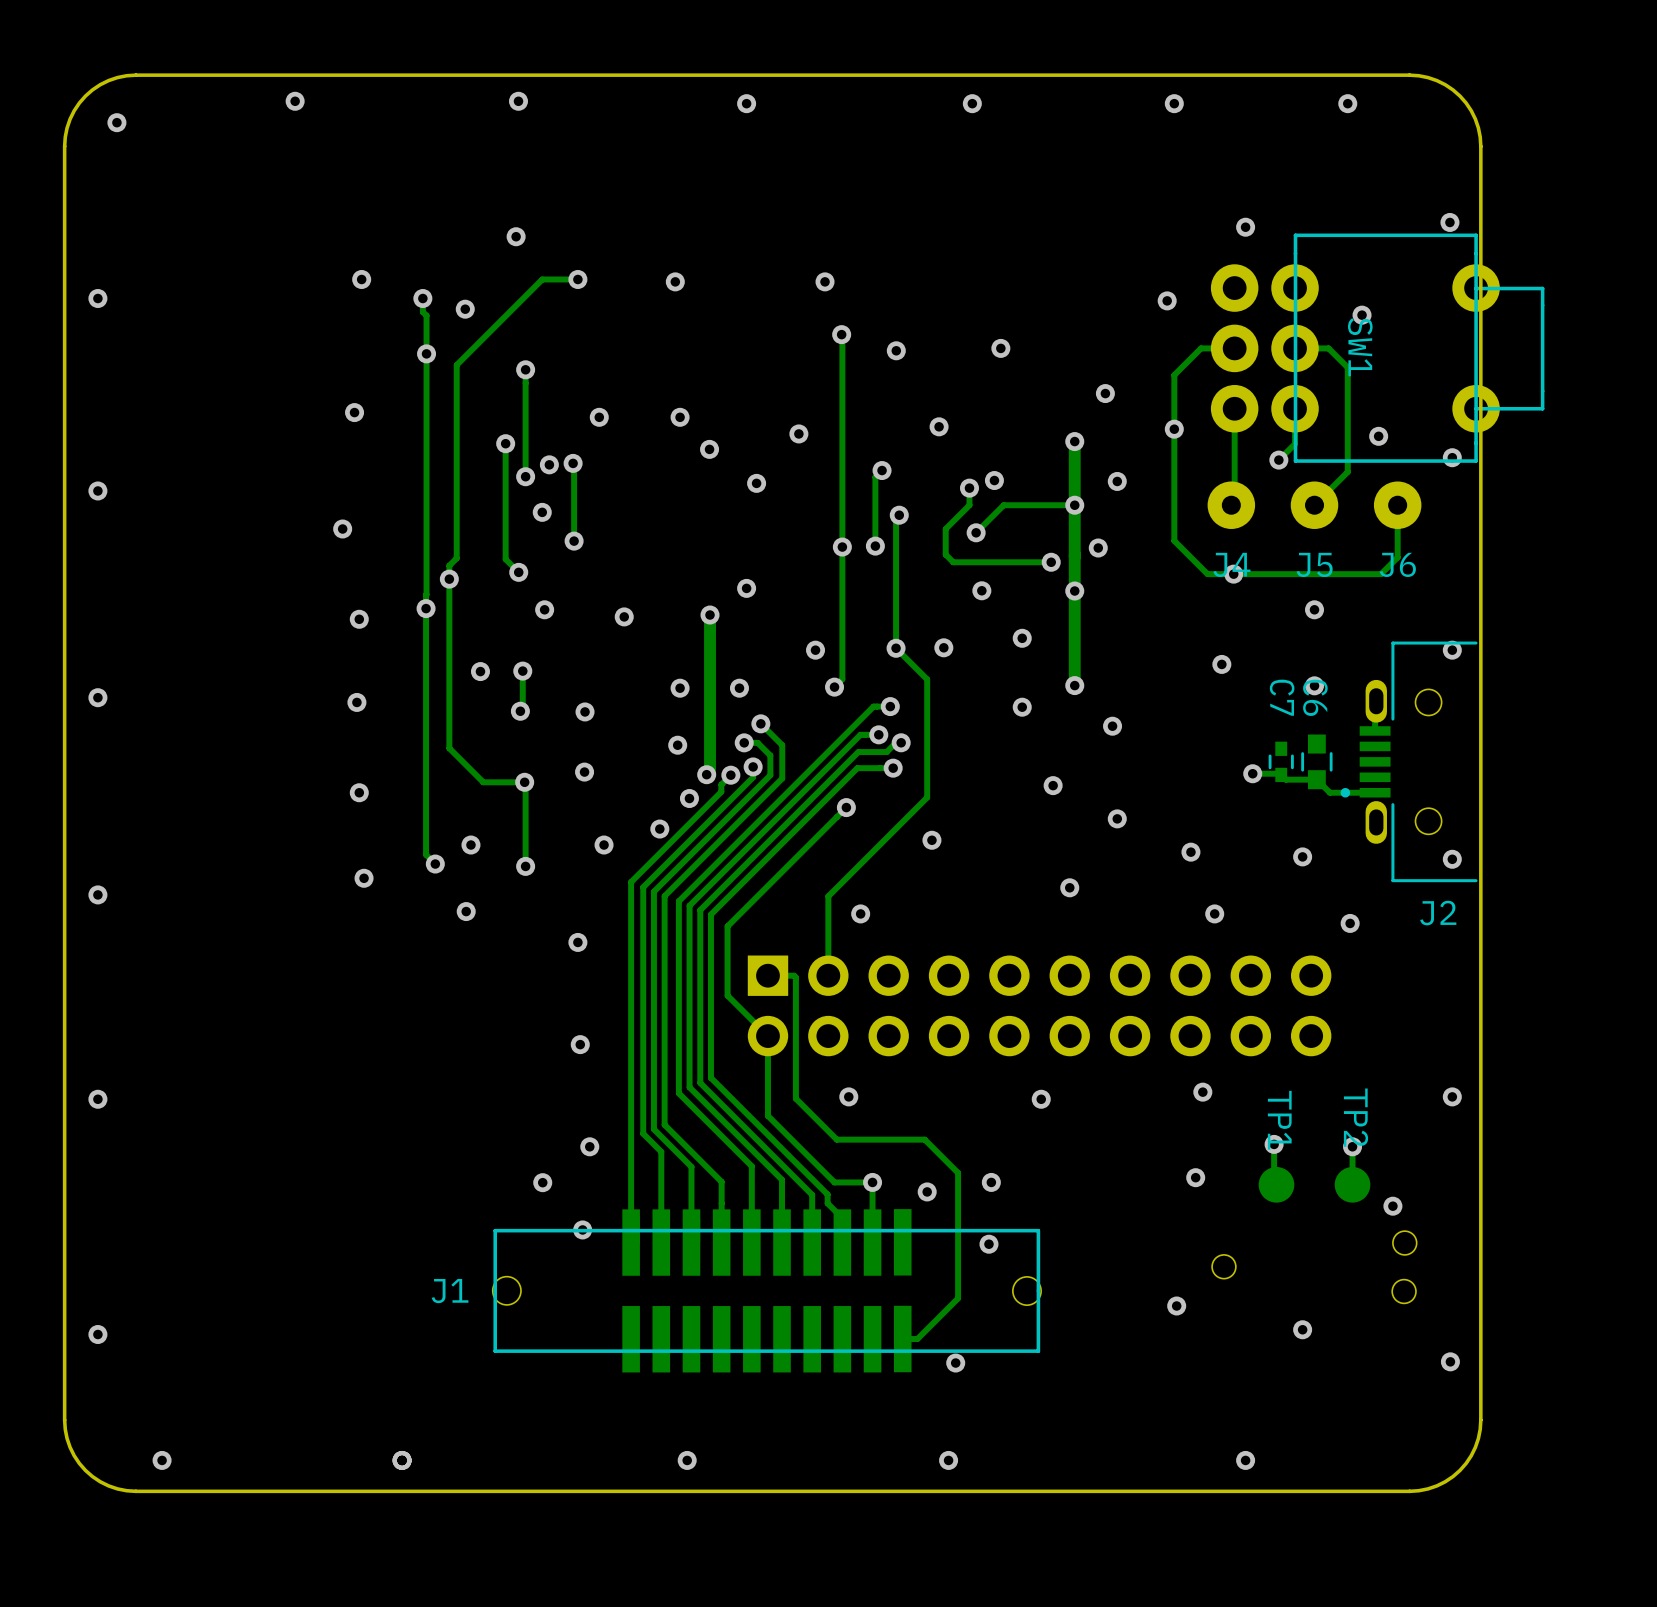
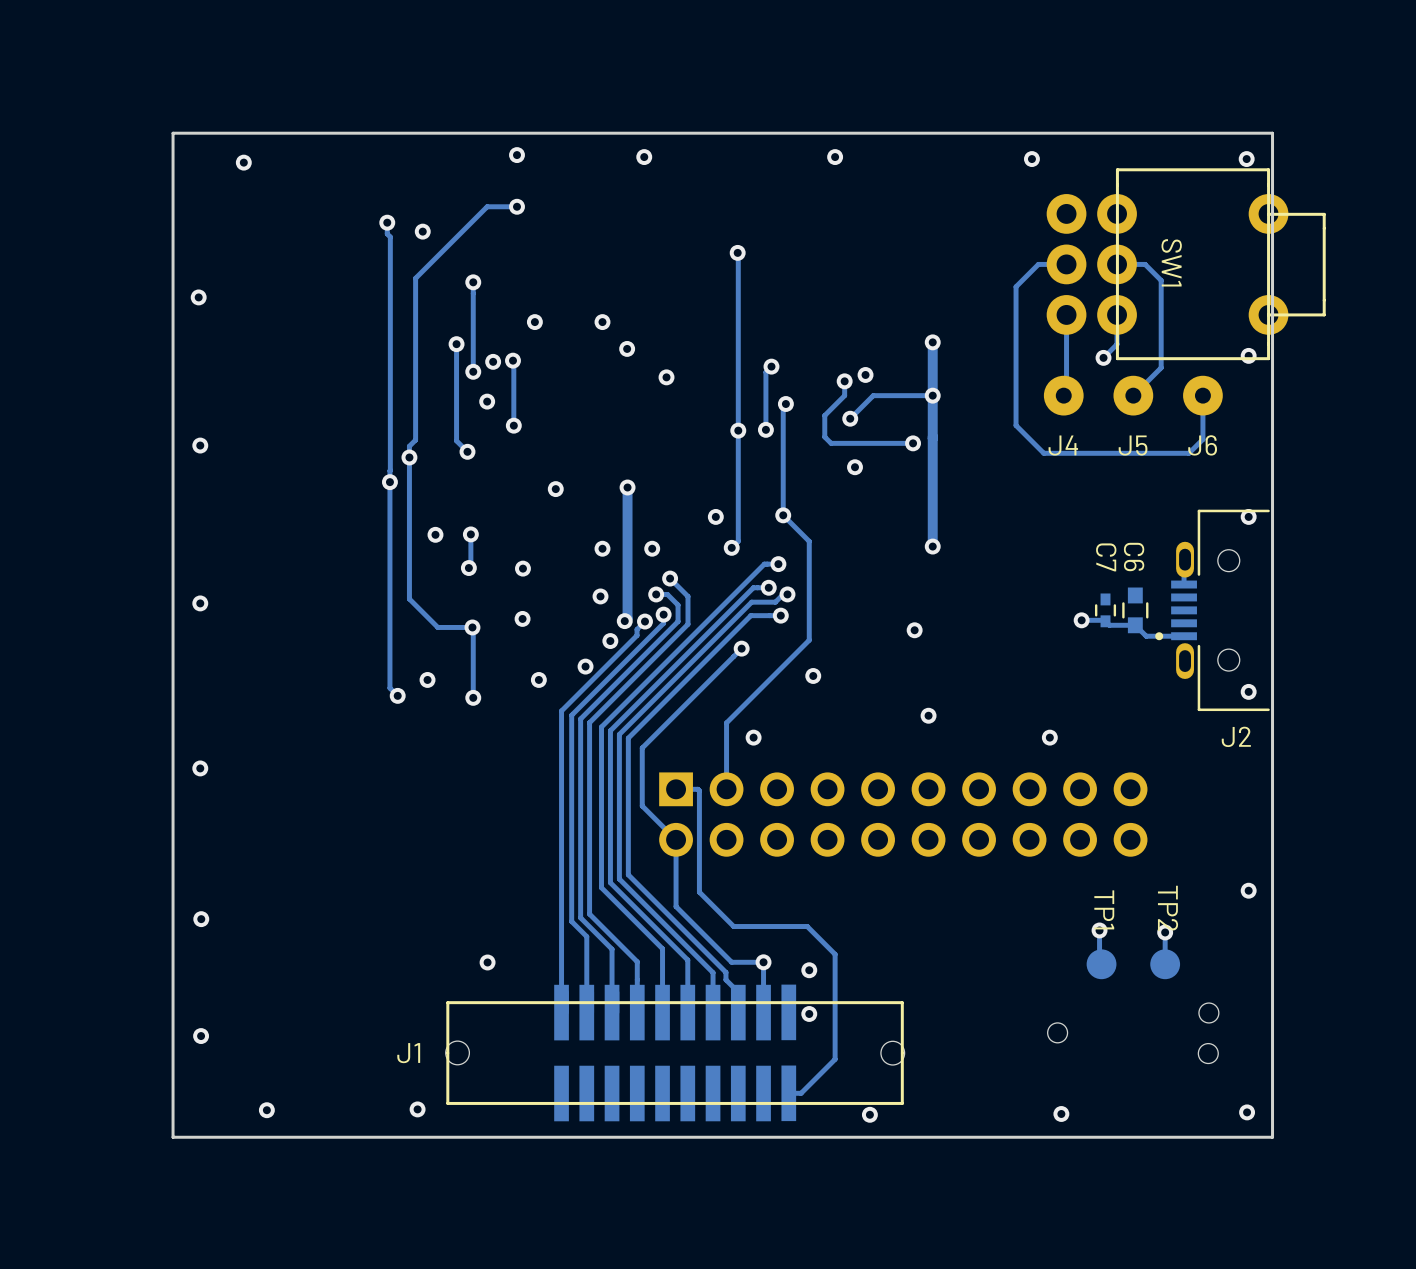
via: (295, 101) -> none
via: (518, 101) -> none
via: (746, 103) -> none
via: (972, 103) -> none
via: (1174, 103) -> none
via: (1347, 103) -> none
via: (116, 122) -> none
board edge: (1480, 191) (1480, 137) (1471, 110) (1459, 96) (1445, 84) (1428, 77) (1409, 75) (135, 75) (108, 80) (85, 96) (70, 119) (64, 146) (64, 1420) (70, 1447) (85, 1470) (108, 1485) (135, 1491) (1409, 1491) (1428, 1488) (1445, 1481) (1466, 1463) (1478, 1438) (1480, 1391) -> (1272, 133) (173, 133) (173, 1137) (1272, 1137)
via: none -> (517, 155)
via: none -> (644, 157)
via: none -> (835, 157)
via: none -> (1031, 159)
via: none -> (243, 162)
via: (1245, 227) -> none
via: (516, 236) -> none
via: (361, 279) -> none
via: (675, 281) -> none
via: (825, 281) -> none
via: (97, 298) -> none
via: (1167, 300) -> none
via: (1362, 315) -> none
via: (1000, 348) -> none
via: (896, 350) -> none
via: (426, 353) -> none
via: none -> (198, 297)
via: (1105, 393) -> none
via: (354, 412) -> none
via: (939, 426) -> none
via: (1174, 429) -> none
via: (798, 433) -> none
via: (1378, 436) -> none
via: (1117, 481) -> none
via: (97, 490) -> none
via: (342, 528) -> none
via: (1098, 548) -> none
via: none -> (200, 445)
via: (1233, 574) -> none
via: (746, 588) -> none
via: (1074, 591) -> none
via: (544, 609) -> none
via: (1314, 609) -> none
via: (359, 619) -> none
via: (1022, 638) -> none
via: (943, 647) -> none
via: (1221, 664) -> none
via: (1314, 685) -> none
via: (97, 697) -> none
via: (356, 702) -> none
via: (1022, 707) -> none
via: (1112, 726) -> none
via: none -> (200, 603)
via: (359, 792) -> none
via: (1117, 818) -> none
via: (1190, 852) -> none
via: (1302, 856) -> none
via: (364, 878) -> none
via: (97, 894) -> none
via: (466, 911) -> none
via: (1350, 923) -> none
via: (577, 942) -> none
via: none -> (200, 768)
via: (580, 1044) -> none
via: (1202, 1092) -> none
via: (848, 1096) -> none
via: (97, 1099) -> none
via: (1041, 1099) -> none
via: none -> (201, 919)
via: (589, 1146) -> none
via: (1195, 1177) -> none
via: (991, 1182) -> none
via: (1392, 1206) -> none
via: (582, 1229) -> none
via: none -> (809, 1013)
via: (988, 1244) -> none
via: none -> (201, 1036)
via: (1176, 1305) -> none
via: (1302, 1329) -> none
via: (97, 1334) -> none
via: none -> (417, 1109)
via: none -> (266, 1110)
via position: (955, 1363) -> (869, 1114)
via: none -> (1061, 1113)
via: (162, 1460) -> none
via: (402, 1460) -> none
via: (687, 1460) -> none
via: (948, 1460) -> none
via: (1245, 1460) -> none

